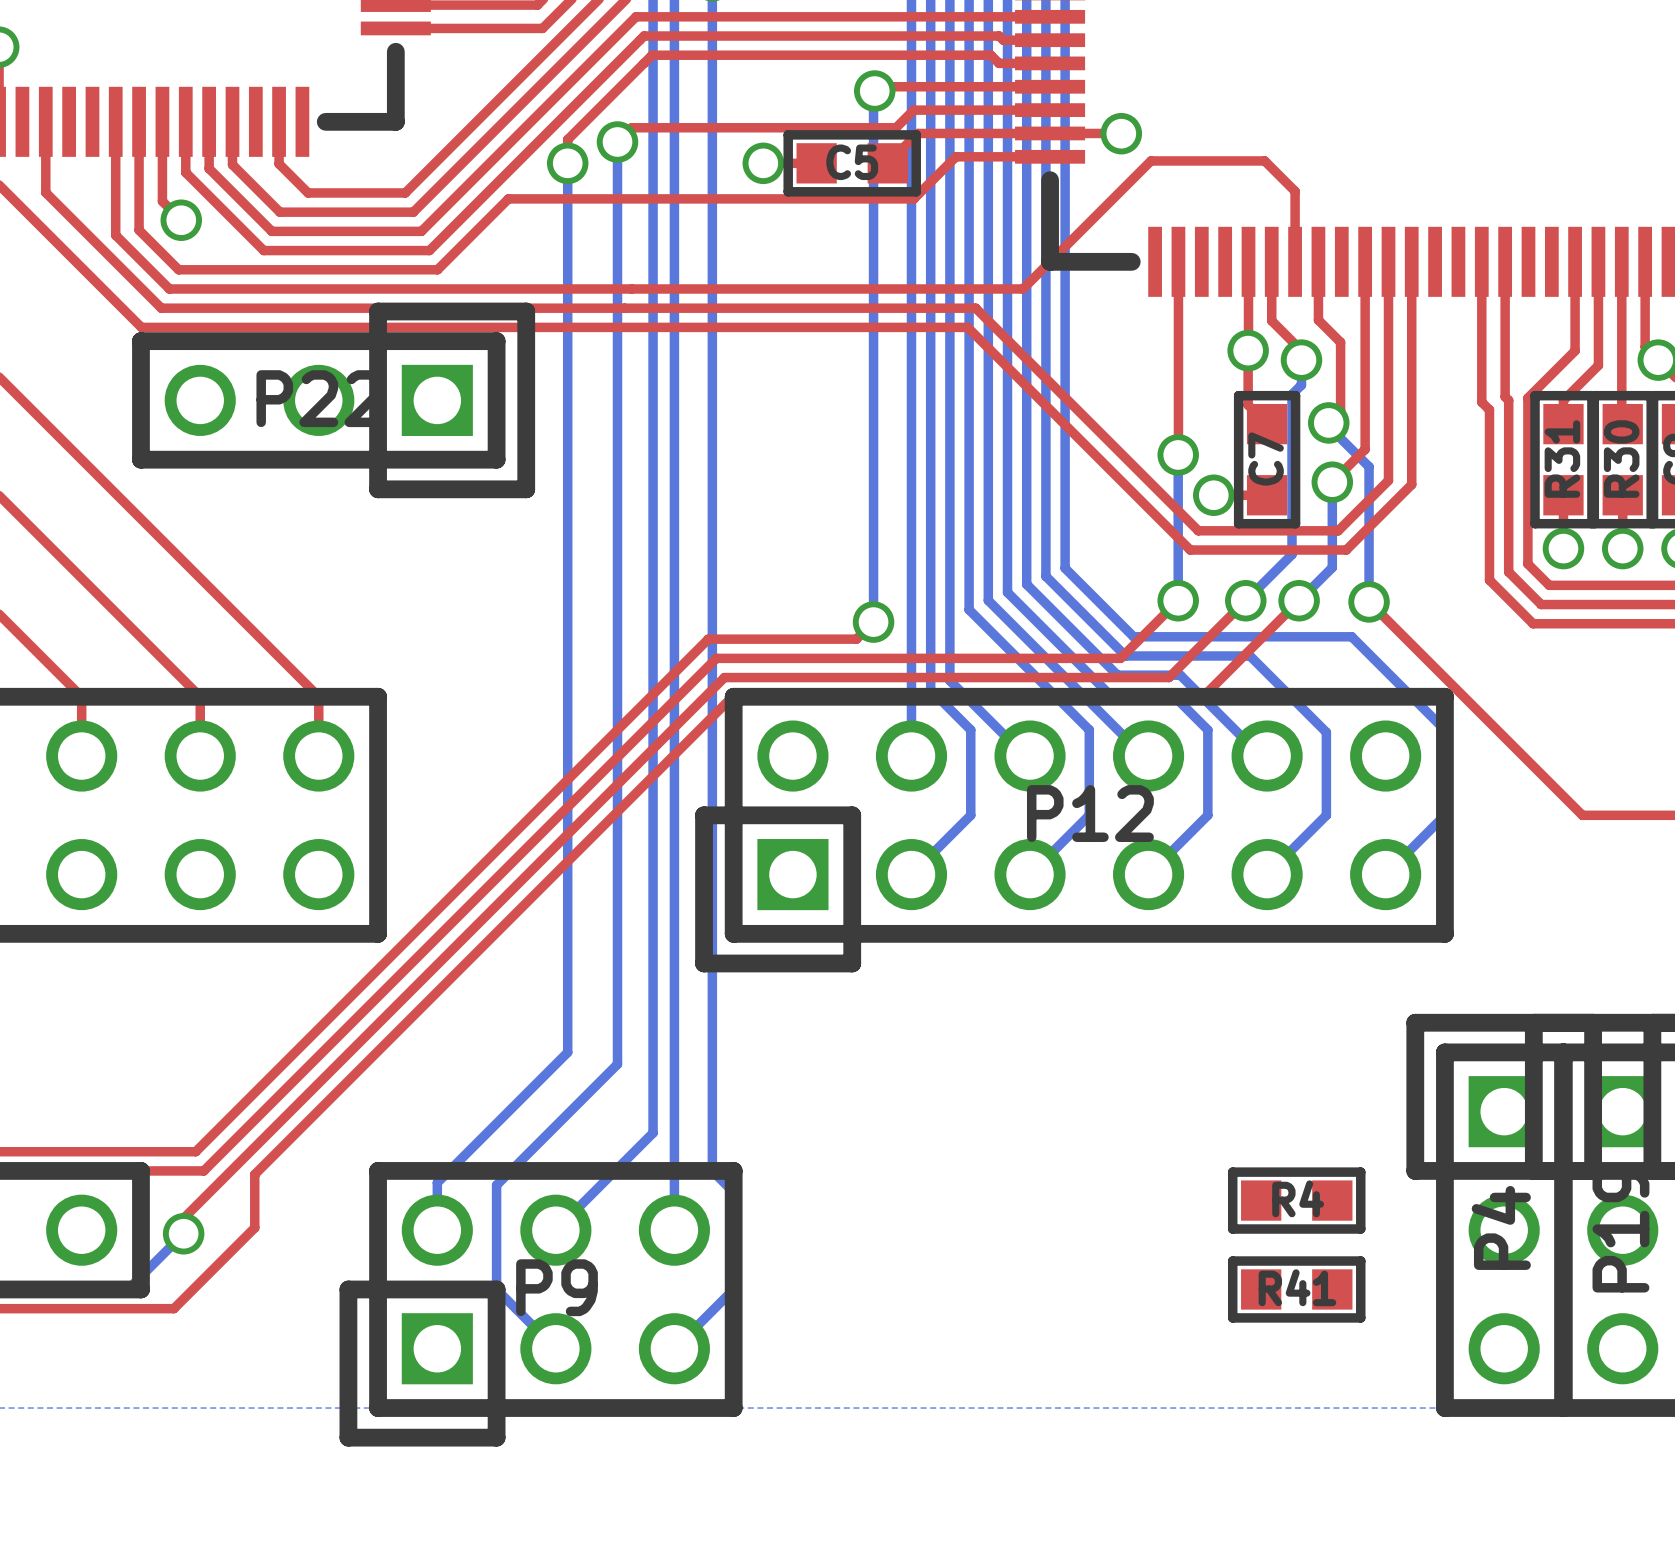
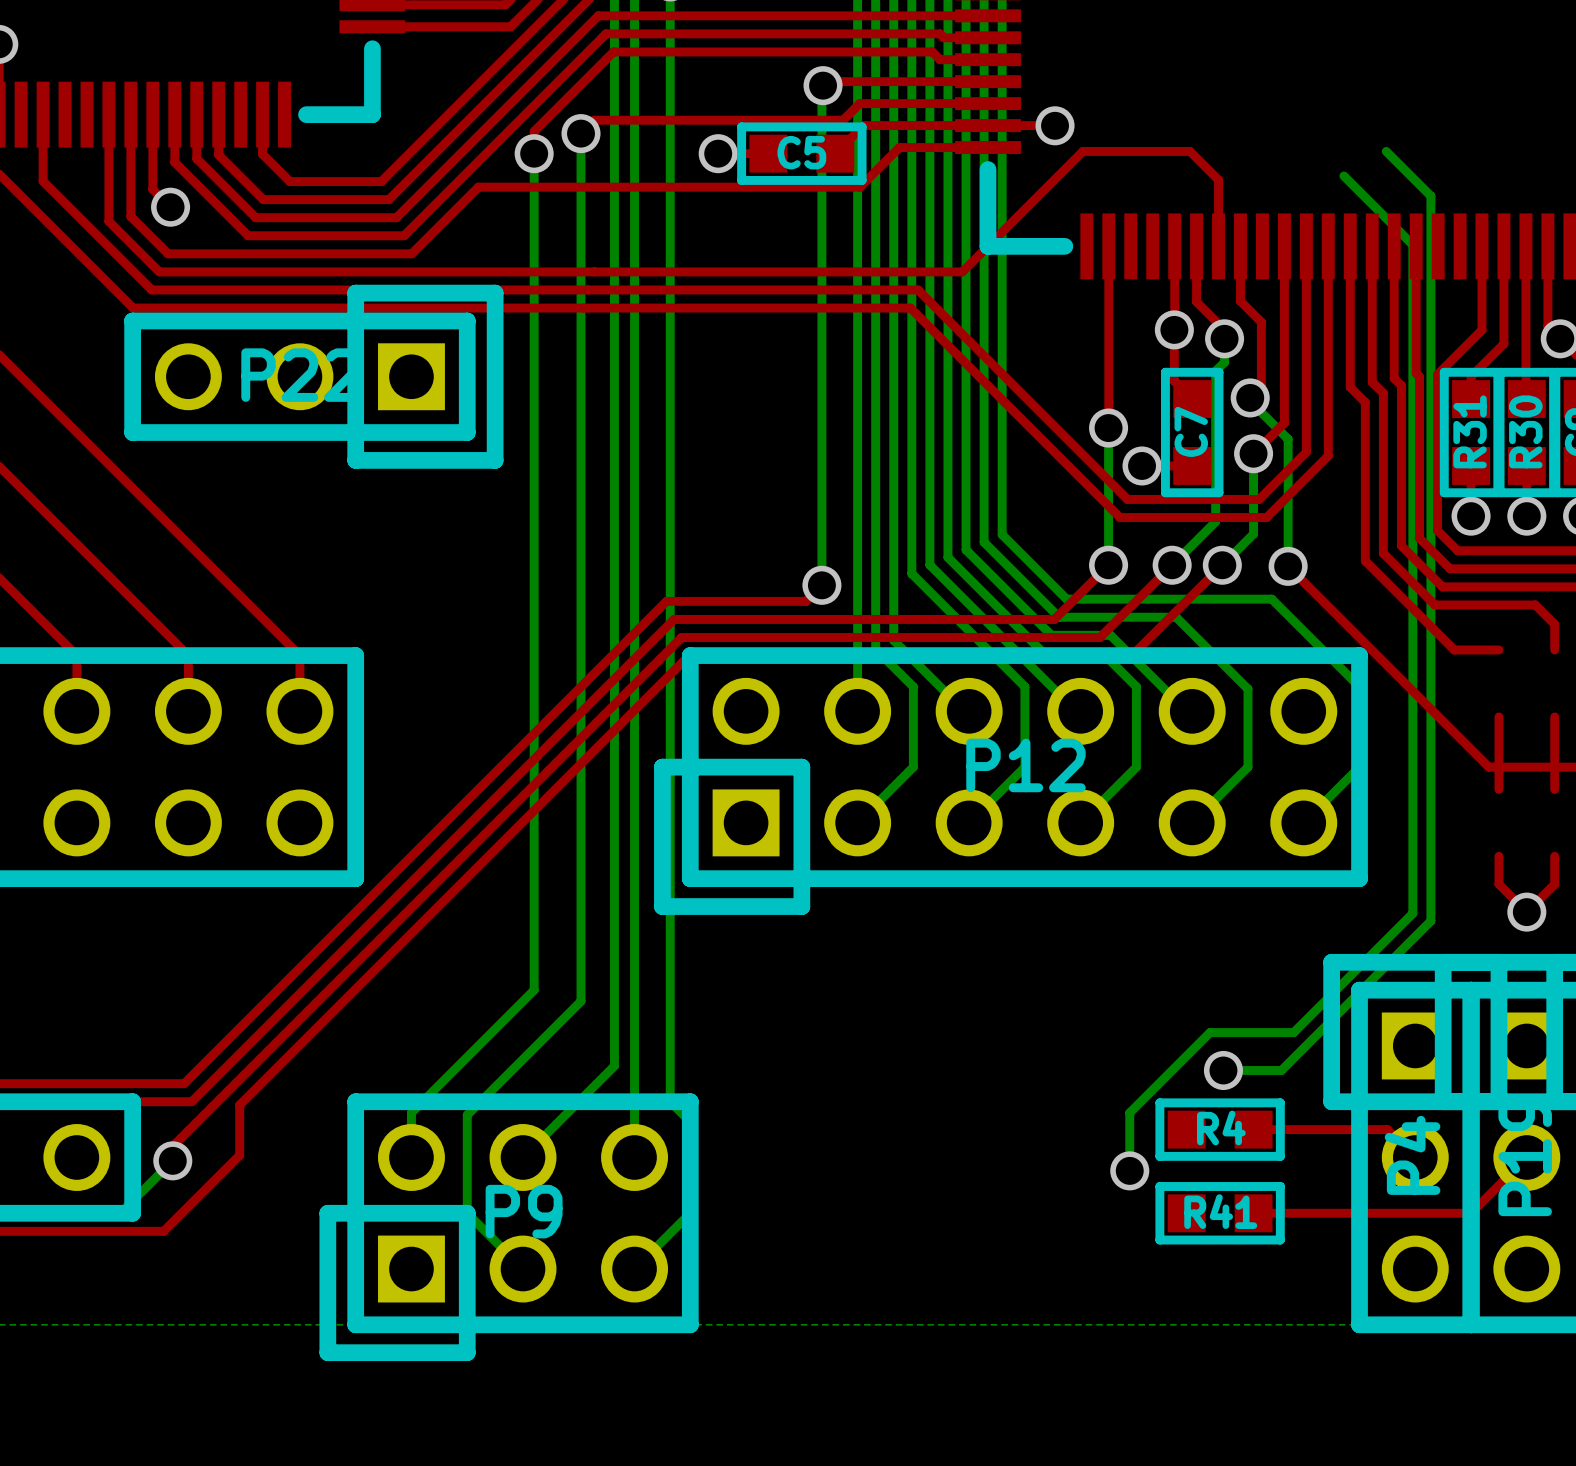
bottom track: none -> (1386, 151) (1430, 196) (1430, 921) (1281, 1070) (1223, 1070)
bottom track: none -> (1343, 175) (1412, 244) (1412, 913) (1293, 1032) (1210, 1032) (1129, 1112) (1129, 1170)
top track: none -> (1350, 246) (1350, 387) (1365, 402) (1365, 561) (1454, 650) (1498, 650)
top track: none -> (1372, 246) (1372, 382) (1383, 393) (1383, 553) (1434, 604) (1535, 604) (1554, 624) (1554, 650)
top track: none -> (1498, 716) (1498, 789)
top track: none -> (1554, 716) (1554, 789)
top track: none -> (1498, 856) (1498, 884) (1526, 912) (1554, 884) (1554, 856)
via: none -> (1526, 912)
via: none -> (1223, 1070)
top track: none -> (1253, 1129) (1387, 1129) (1415, 1157)
top track: none -> (1526, 1157) (1471, 1213) (1253, 1213)
via: none -> (1129, 1170)

